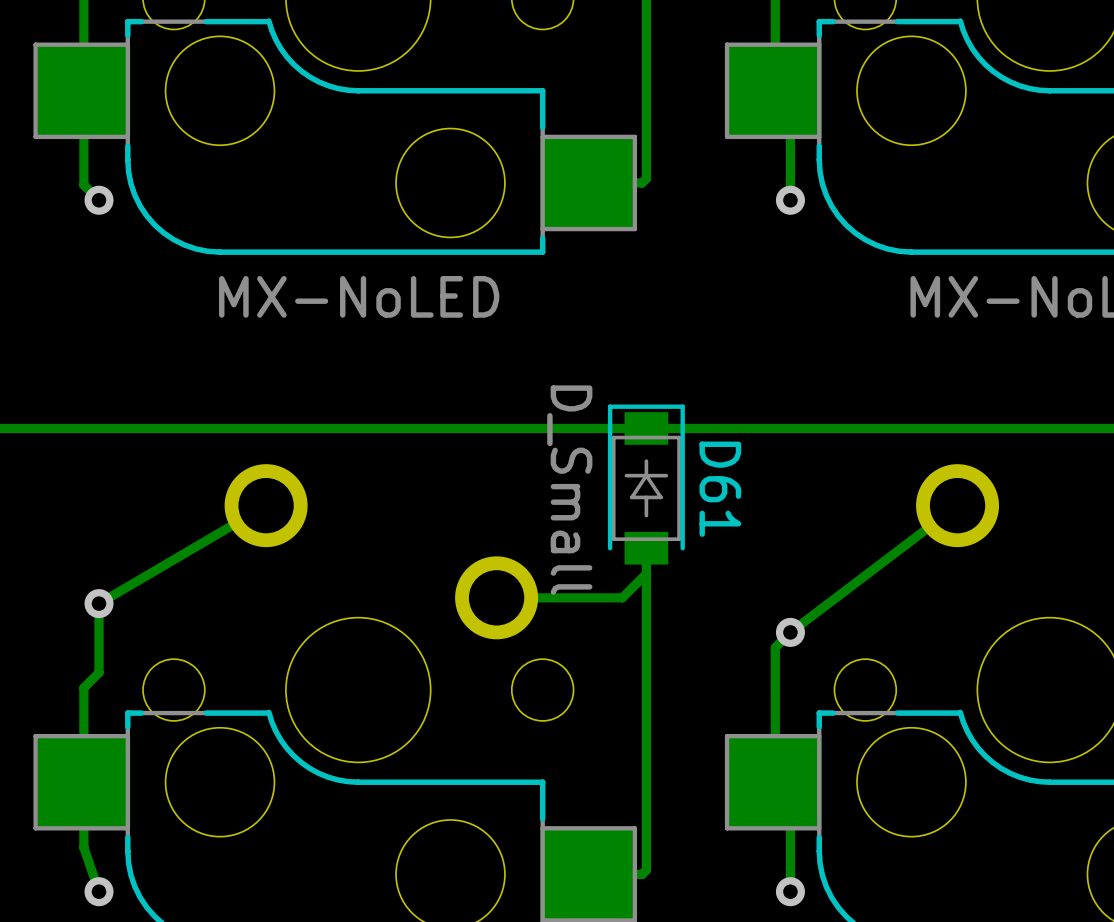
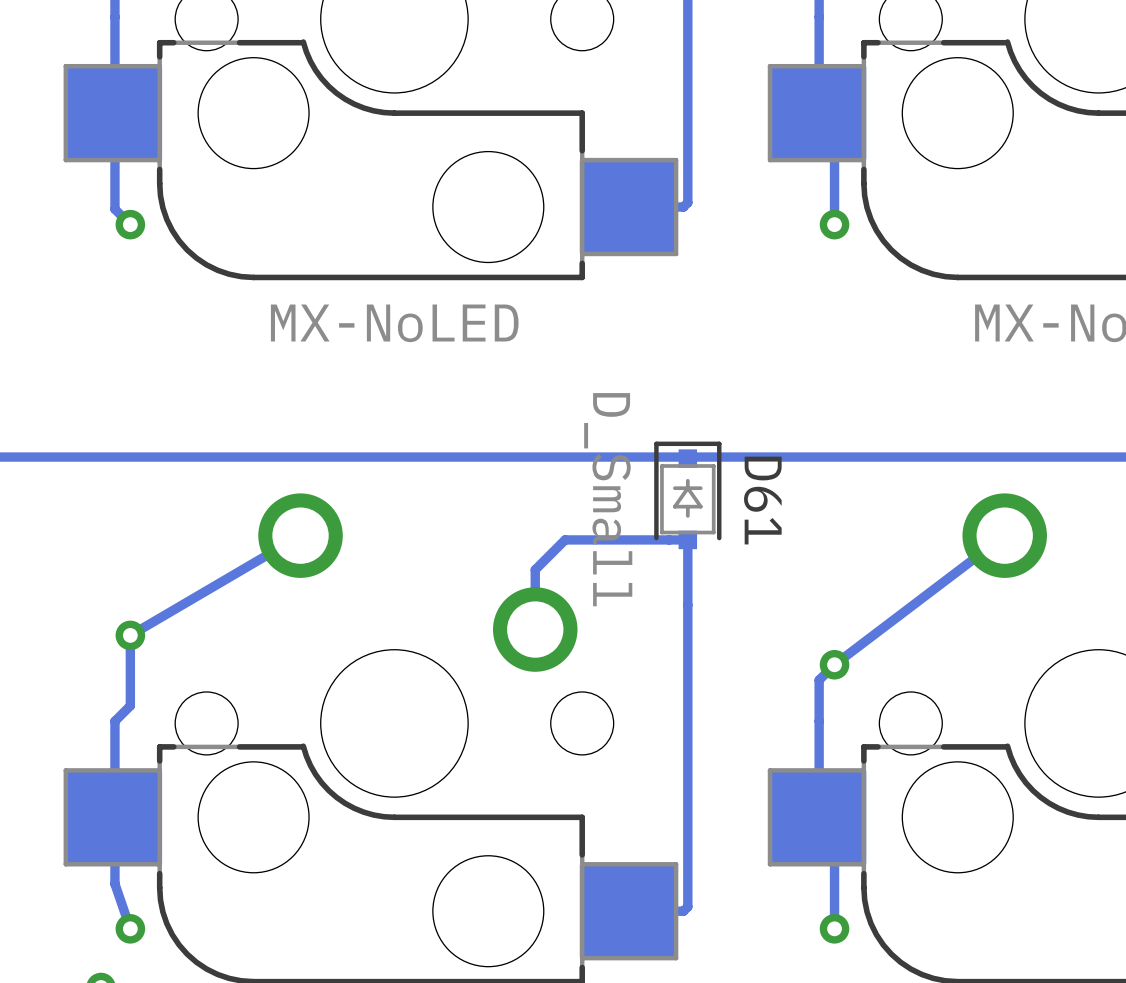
D61 footprint: [607, 404, 685, 565] -> [654, 441, 722, 550]
track: none -> (687, 541) (687, 579)
track: (646, 573) (622, 597) (496, 597) -> (687, 539) (565, 539) (535, 569) (535, 629)

